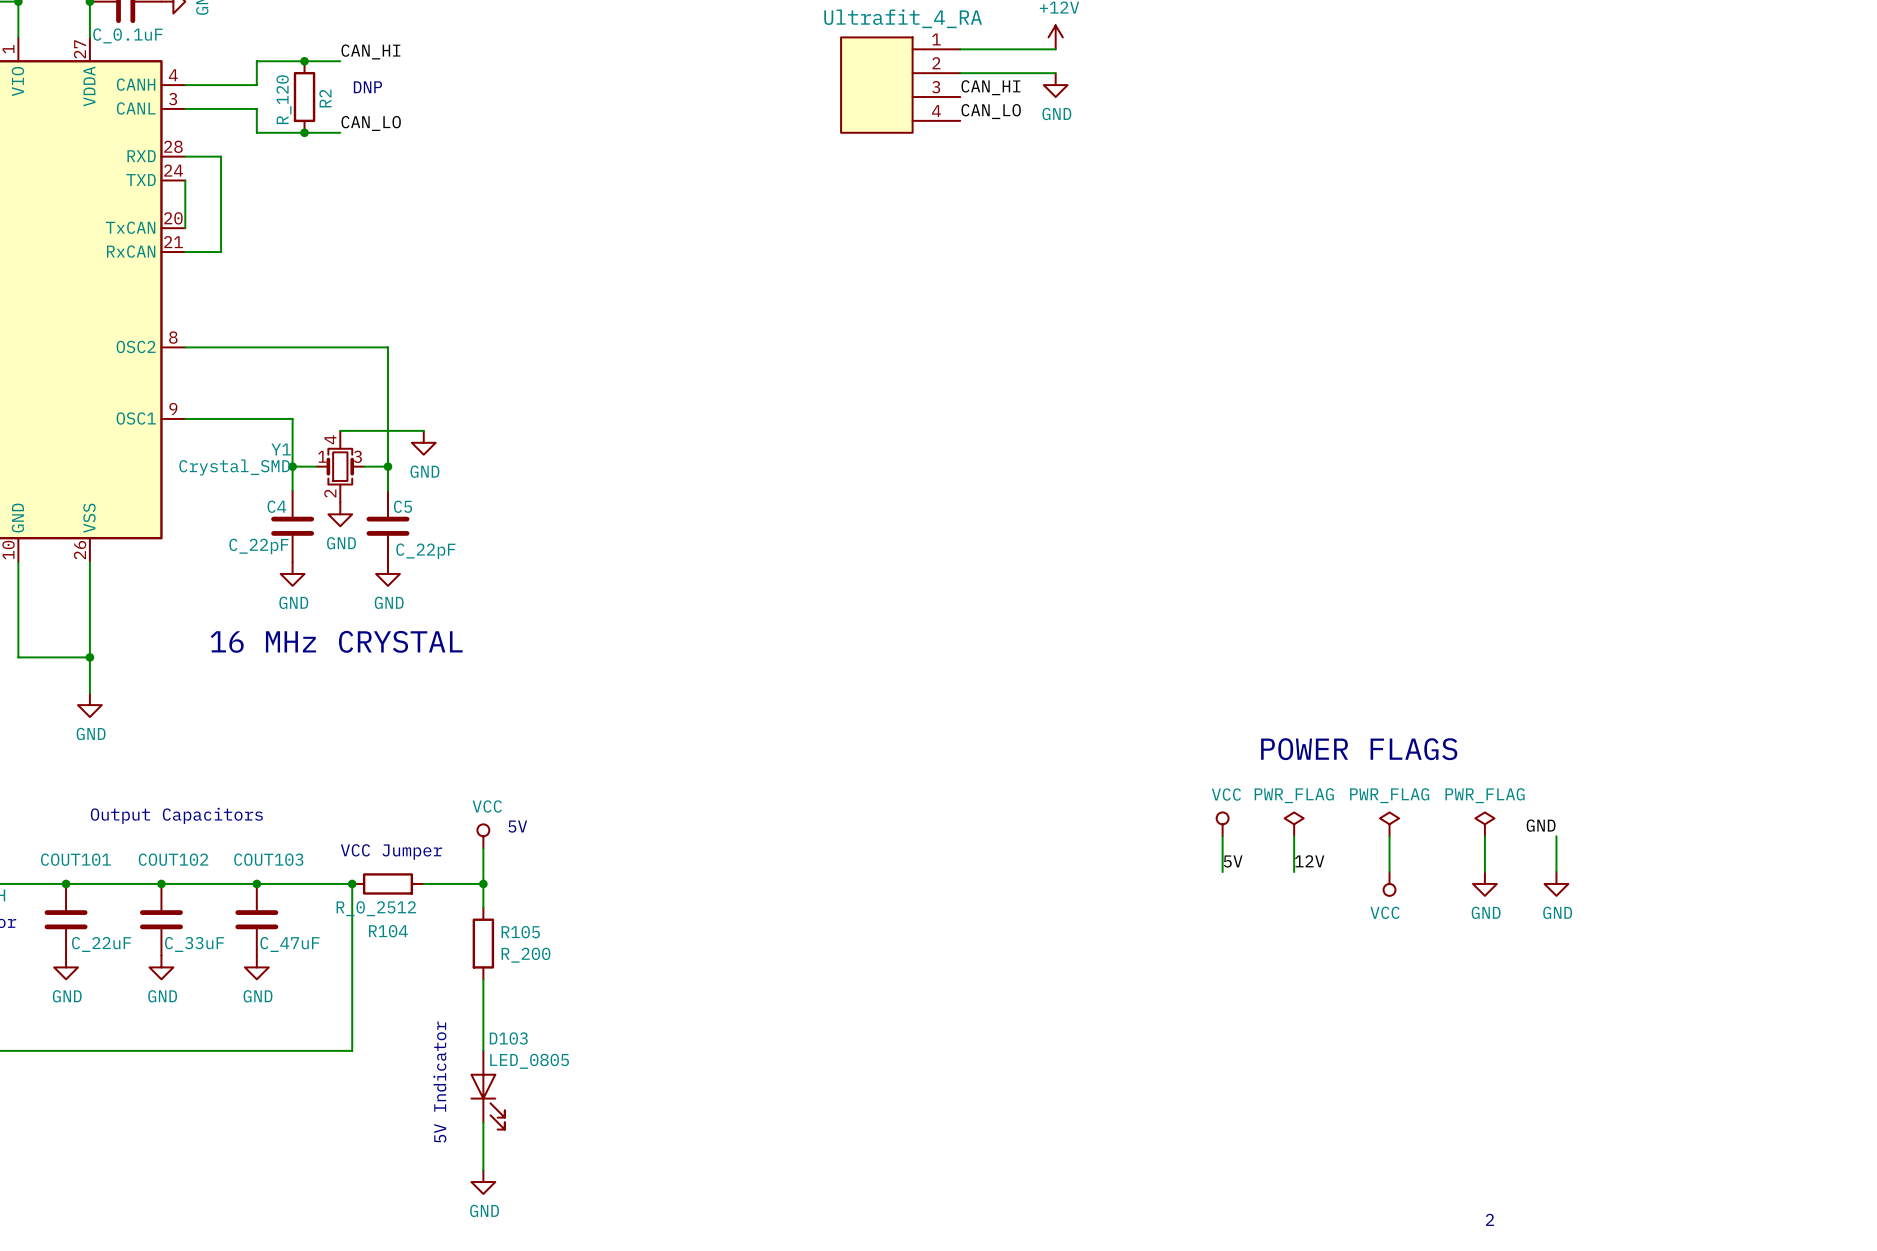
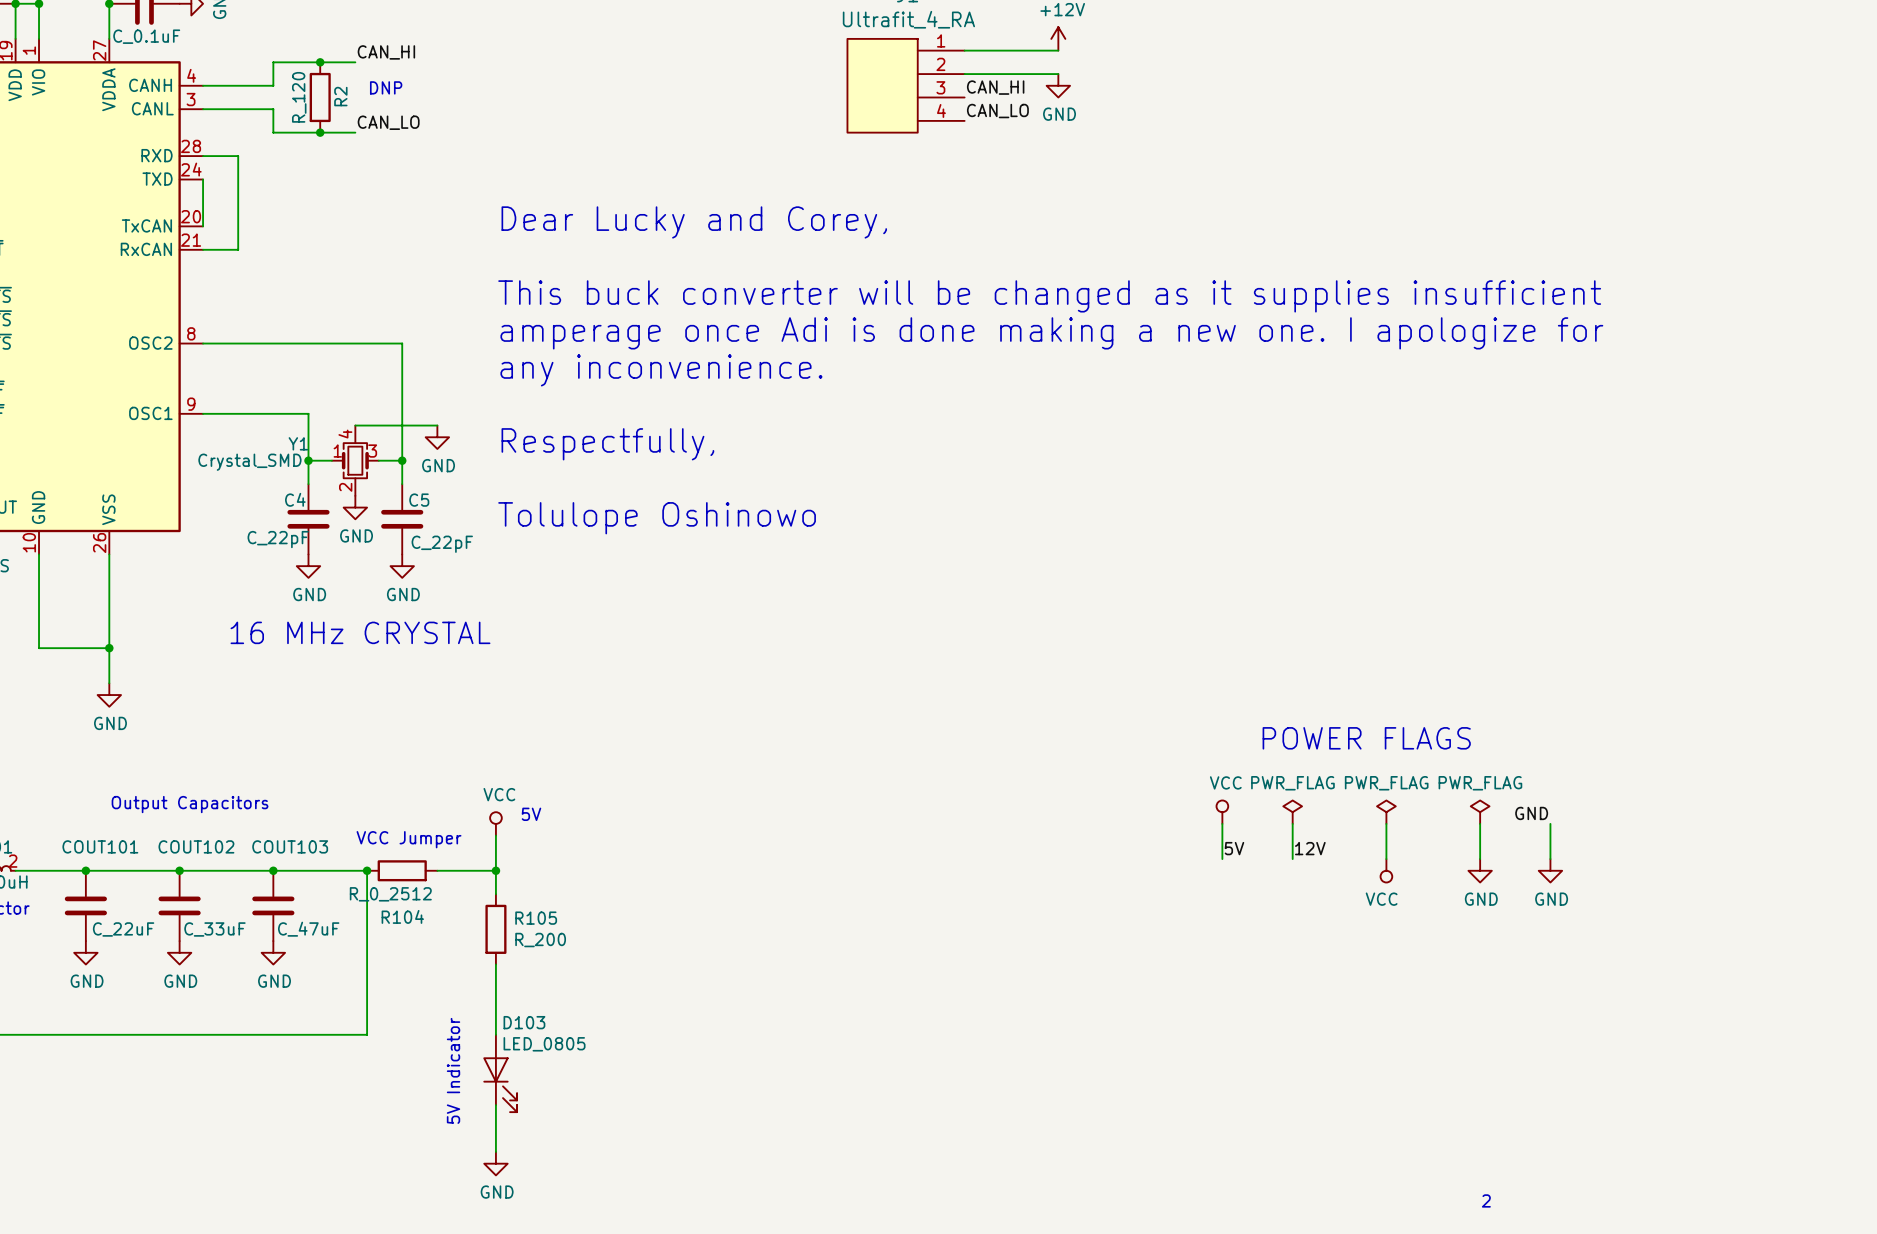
text: none -> Dear Lucky and Corey, (694, 222)
text: none -> This buck converter will be changed as it supplies insufficient (1049, 296)
text: none -> amperage once Adi is done making a new one. I apologize for (1051, 333)
text: none -> any inconvenience. (661, 370)
text: none -> Respectfully, (607, 444)
text: none -> Tolulope Oshinowo (657, 518)

